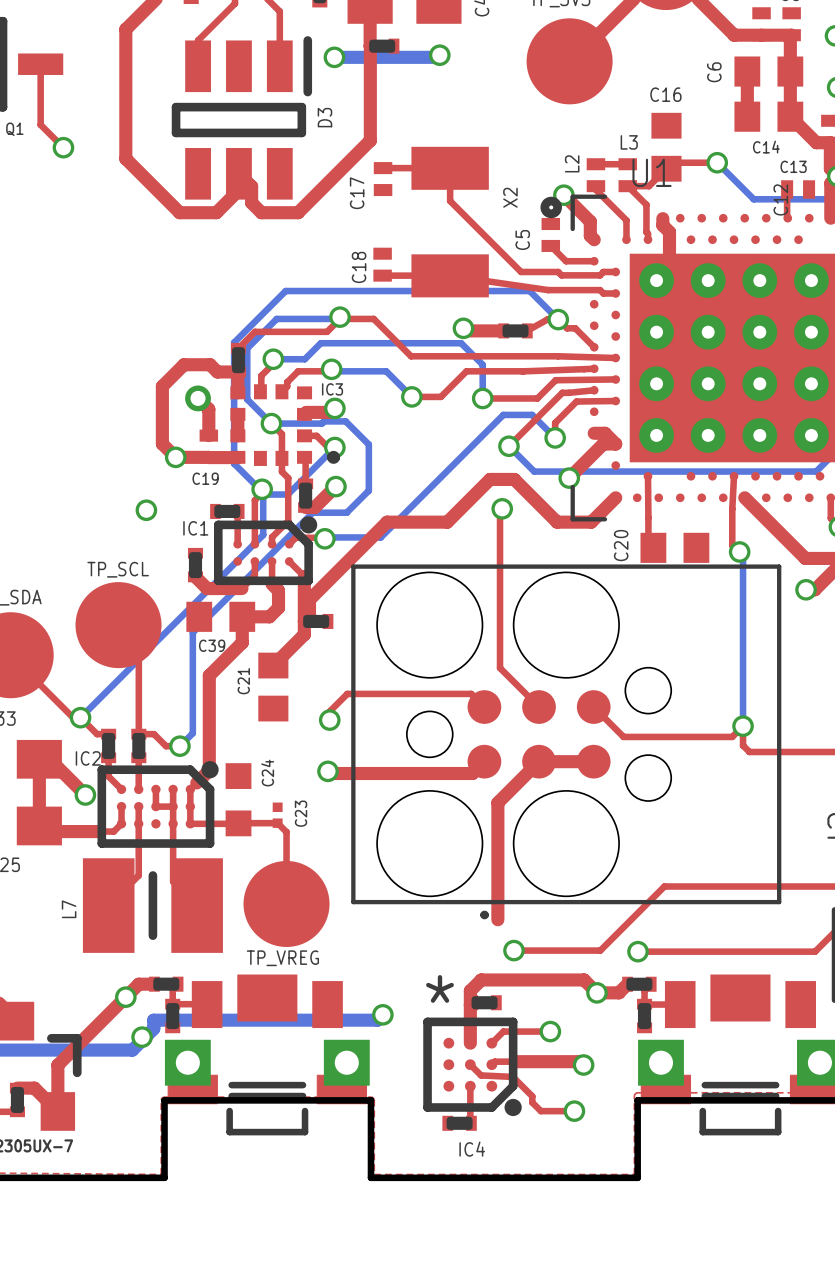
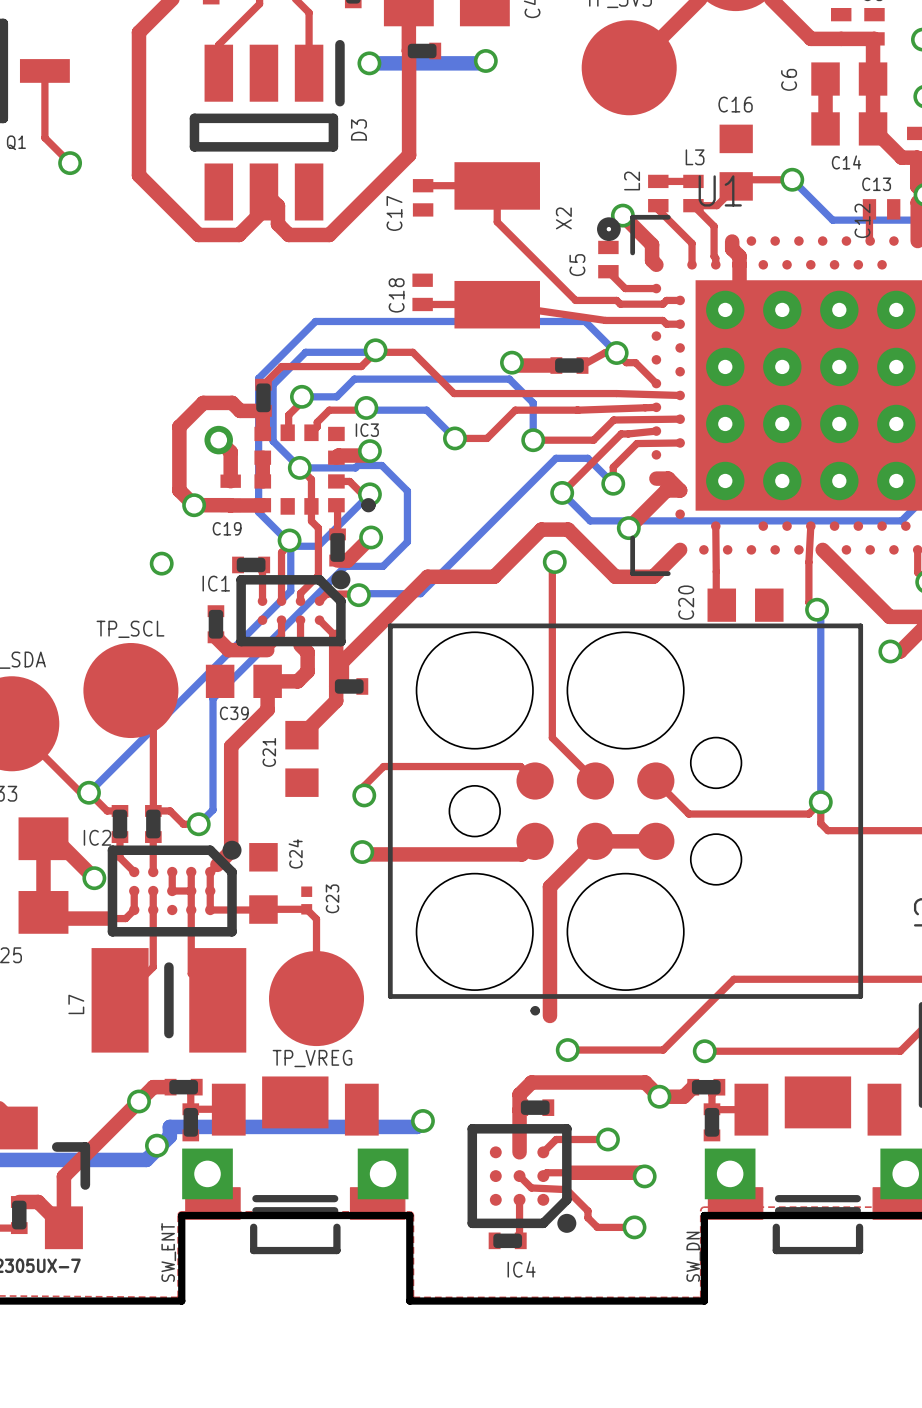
SW_ENT text: * (439, 988) -> none
SW_ENT name: none -> SW_ENT (168, 1252)
SW_DN name: none -> SW_DN (693, 1256)

